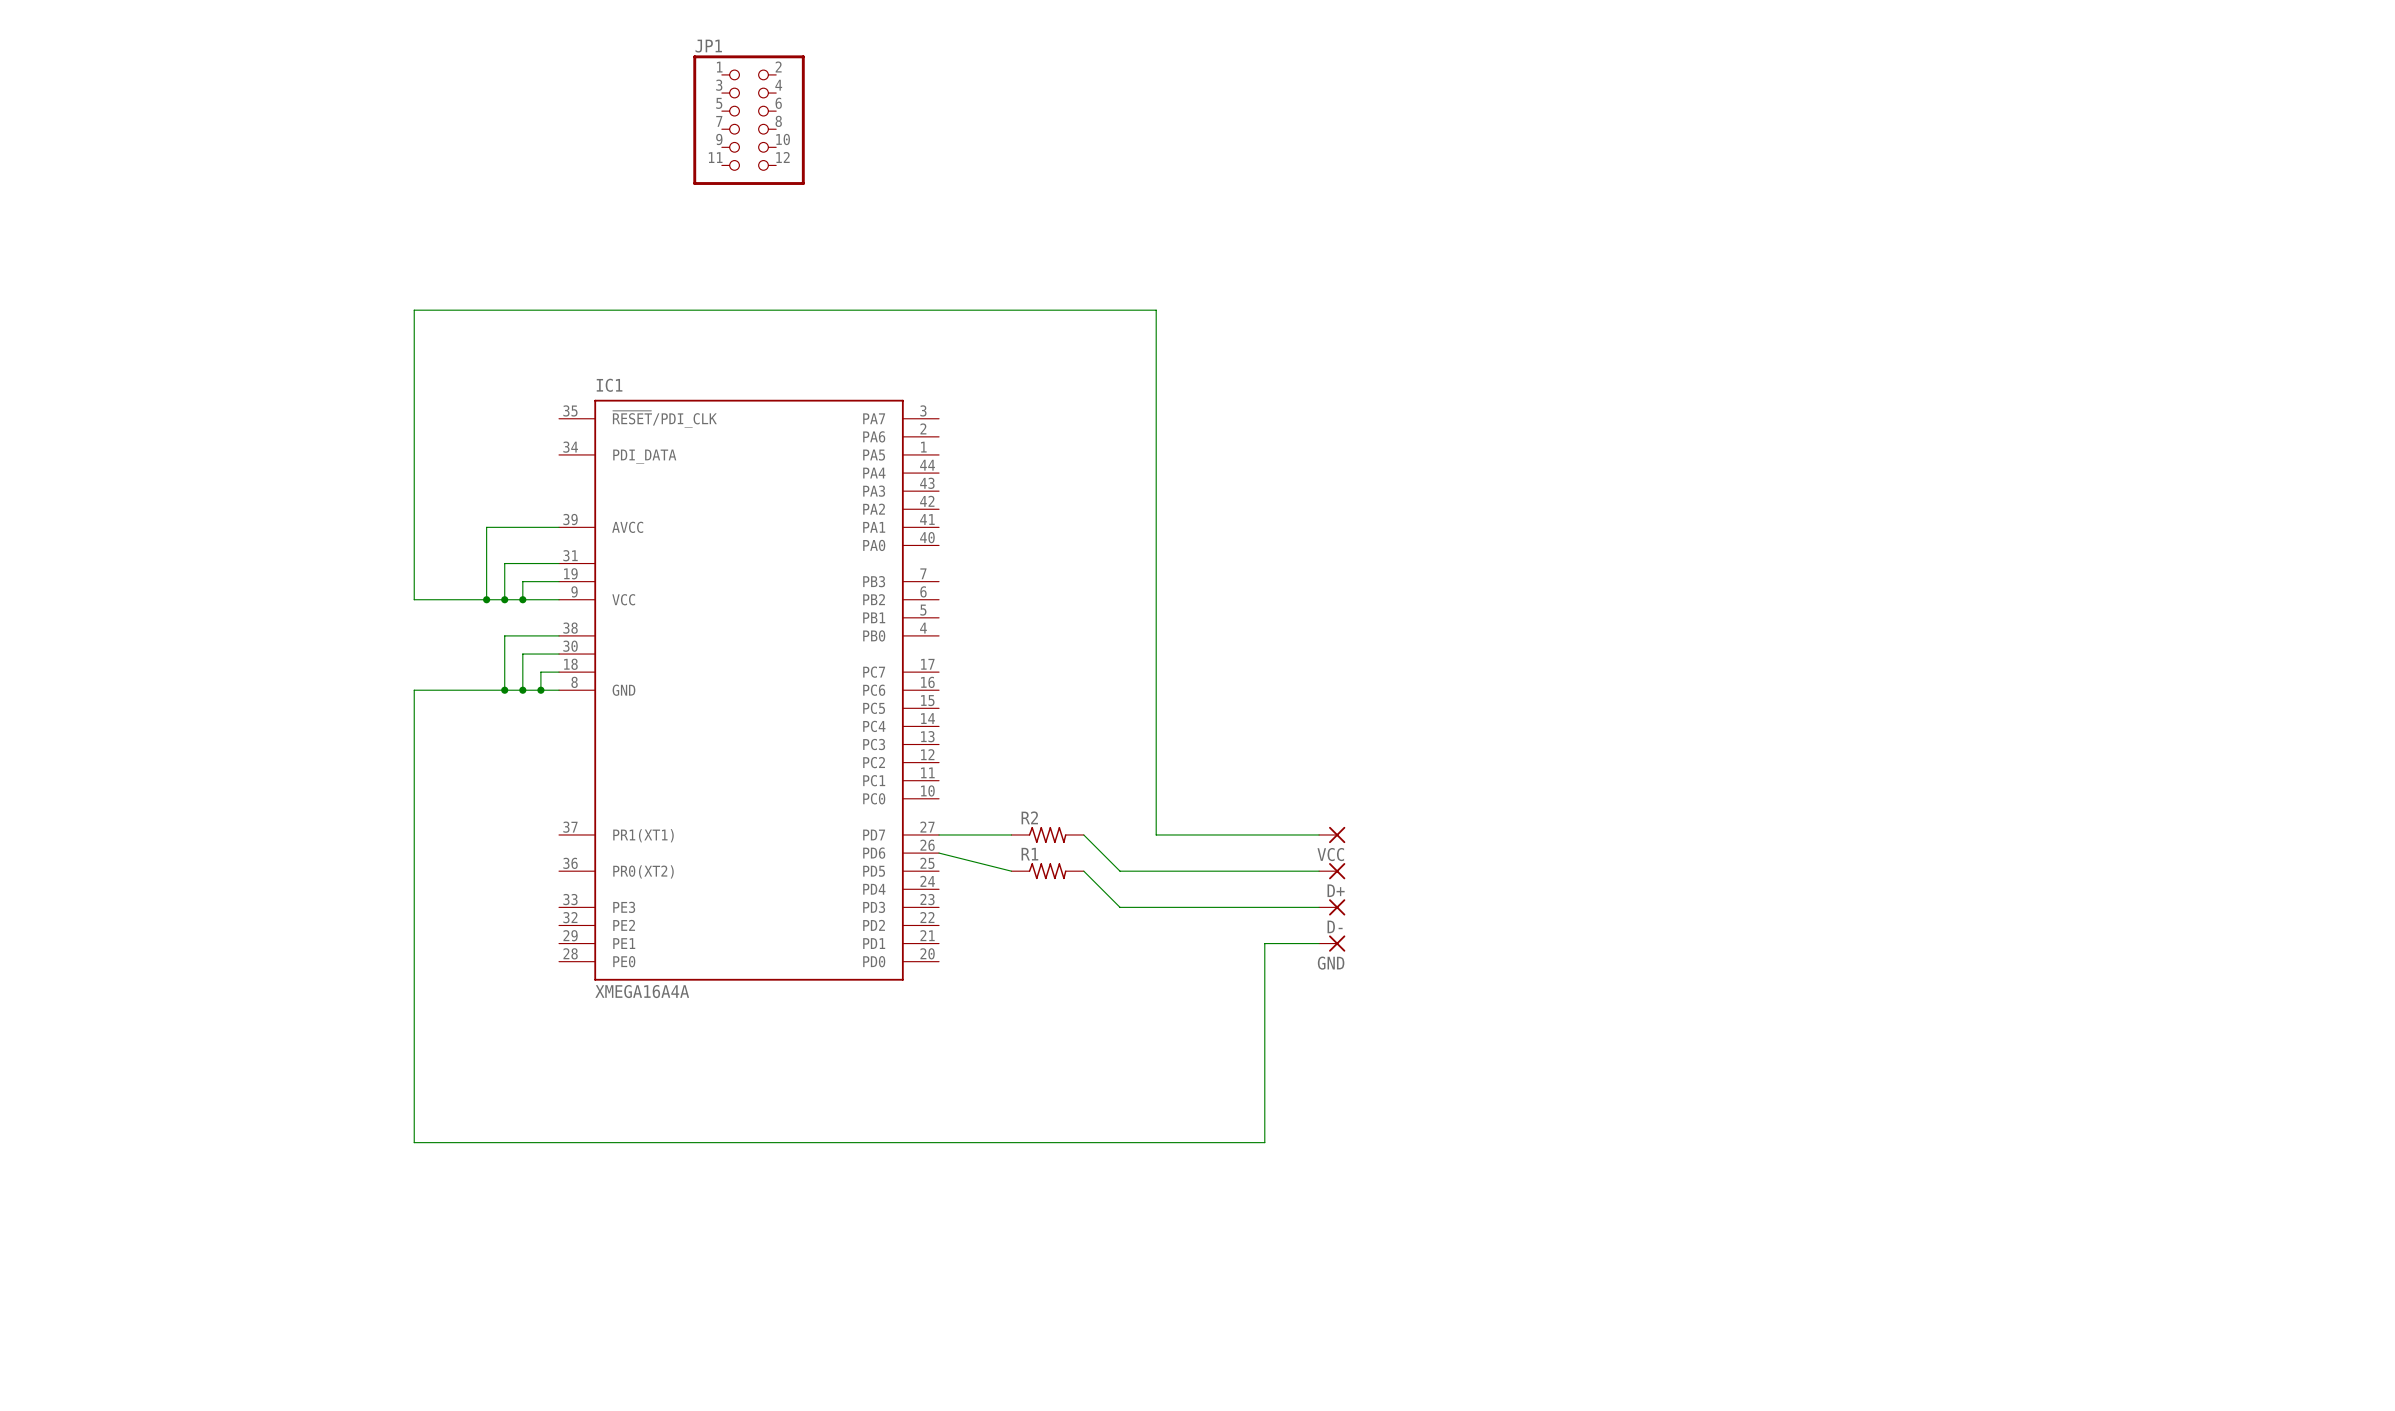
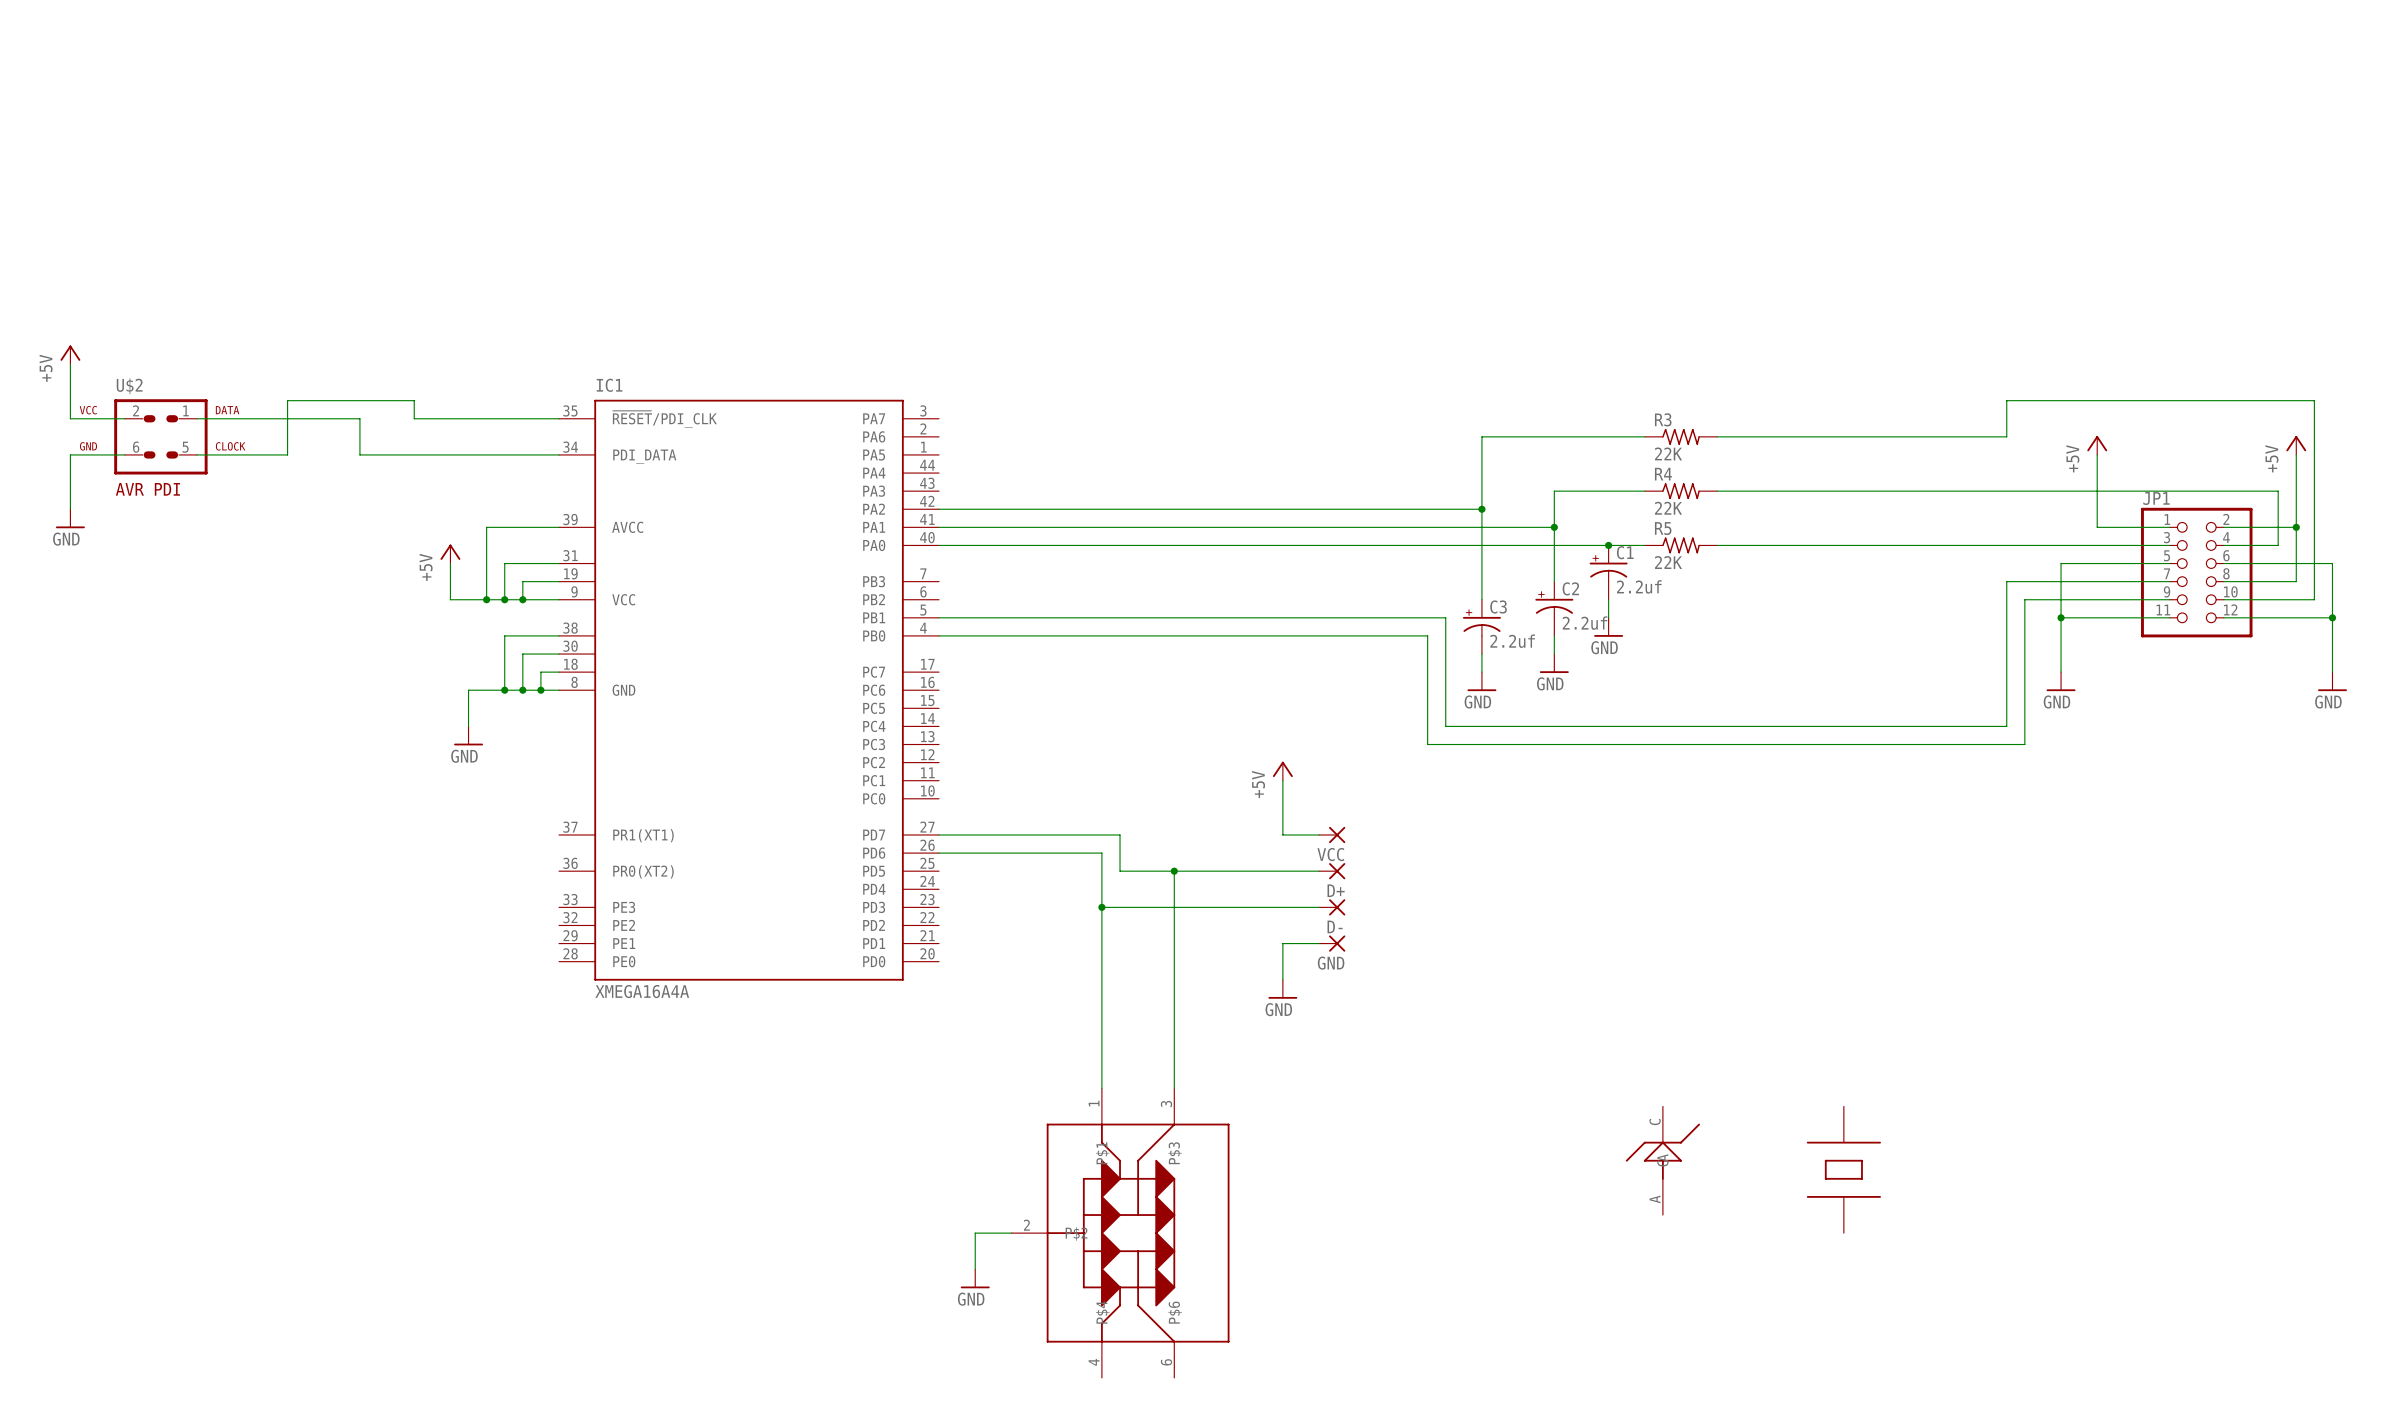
JP1 position: (749, 120) -> (2196, 572)
power symbol: none -> +5V (70, 354)
wire: none -> (70, 364) (70, 418) (124, 418)
wire: (414, 400) (414, 310) (1156, 310) (1156, 834) (1282, 834) -> (1282, 780) (1282, 834)
wire: none -> (414, 400) (287, 400) (287, 454) (197, 454)
wire: none -> (197, 418) (359, 418) (359, 454) (559, 454)
wire: (414, 418) (414, 599) (450, 599) -> (450, 563) (450, 599)
wire: none -> (414, 418) (559, 418)
U$2: none -> (160, 436)
wire: none -> (1644, 436) (1481, 436) (1481, 599)
R3: none -> 22K (1681, 436)
wire: none -> (1717, 436) (2006, 436) (2006, 400) (2314, 400) (2314, 599) (2223, 599)
power symbol: none -> +5V (2097, 445)
power symbol: none -> +5V (2296, 445)
wire: none -> (124, 454) (70, 454) (70, 509)
wire: none -> (2097, 454) (2097, 527) (2169, 527)
wire: none -> (2296, 454) (2296, 581) (2223, 581)
wire: none -> (1644, 491) (1554, 491) (1554, 581)
R4: none -> 22K (1681, 491)
wire: none -> (1717, 491) (2278, 491) (2278, 545) (2223, 545)
wire: none -> (939, 509) (1481, 509)
junction: none -> (1481, 509)
power symbol: none -> GND (70, 518)
wire: none -> (939, 527) (1554, 527)
junction: none -> (1554, 527)
wire: none -> (2223, 527) (2296, 527)
junction: none -> (2296, 527)
wire: none -> (939, 545) (1644, 545)
junction: none -> (1608, 545)
R5: none -> 22K (1681, 545)
wire: none -> (1717, 545) (2169, 545)
power symbol: none -> +5V (450, 554)
wire: none -> (2169, 563) (2061, 563) (2061, 672)
wire: none -> (2223, 563) (2332, 563) (2332, 672)
C1: none -> 2.2uf (1608, 572)
wire: none -> (2169, 581) (2006, 581) (2006, 726) (1445, 726) (1445, 617) (939, 617)
wire: none -> (1608, 599) (1608, 617)
wire: none -> (2169, 599) (2024, 599) (2024, 744) (1427, 744) (1427, 635) (939, 635)
C2: none -> 2.2uf (1554, 608)
wire: none -> (2061, 617) (2169, 617)
junction: none -> (2061, 617)
wire: none -> (2223, 617) (2332, 617)
junction: none -> (2332, 617)
C3: none -> 2.2uf (1481, 626)
power symbol: none -> GND (1608, 627)
wire: none -> (1554, 635) (1554, 654)
wire: none -> (1481, 654) (1481, 672)
power symbol: none -> GND (1554, 663)
power symbol: none -> GND (1481, 681)
power symbol: none -> GND (2061, 681)
power symbol: none -> GND (2332, 681)
wire: (468, 690) (414, 690) (414, 1142) (1264, 1142) (1264, 943) (1282, 943) -> (468, 690) (468, 726)
power symbol: none -> GND (468, 735)
power symbol: none -> +5V (1282, 771)
R2: (1047, 834) -> none
wire: (1083, 834) (1120, 871) -> (1011, 834) (1120, 834) (1120, 871)
wire: (939, 853) (1011, 871) -> (939, 853) (1101, 853) (1101, 1088)
R1: (1047, 871) -> none
wire: (1083, 871) (1120, 907) -> (1101, 907) (1120, 907)
wire: none -> (1174, 871) (1174, 1088)
junction: none -> (1174, 871)
junction: none -> (1101, 907)
wire: none -> (1282, 943) (1282, 979)
power symbol: none -> GND (1282, 989)
part: none -> (1662, 1160)
part: none -> (1843, 1169)
wire: none -> (1011, 1233) (975, 1233) (975, 1269)
part: none -> (1120, 1233)
power symbol: none -> GND (975, 1278)

